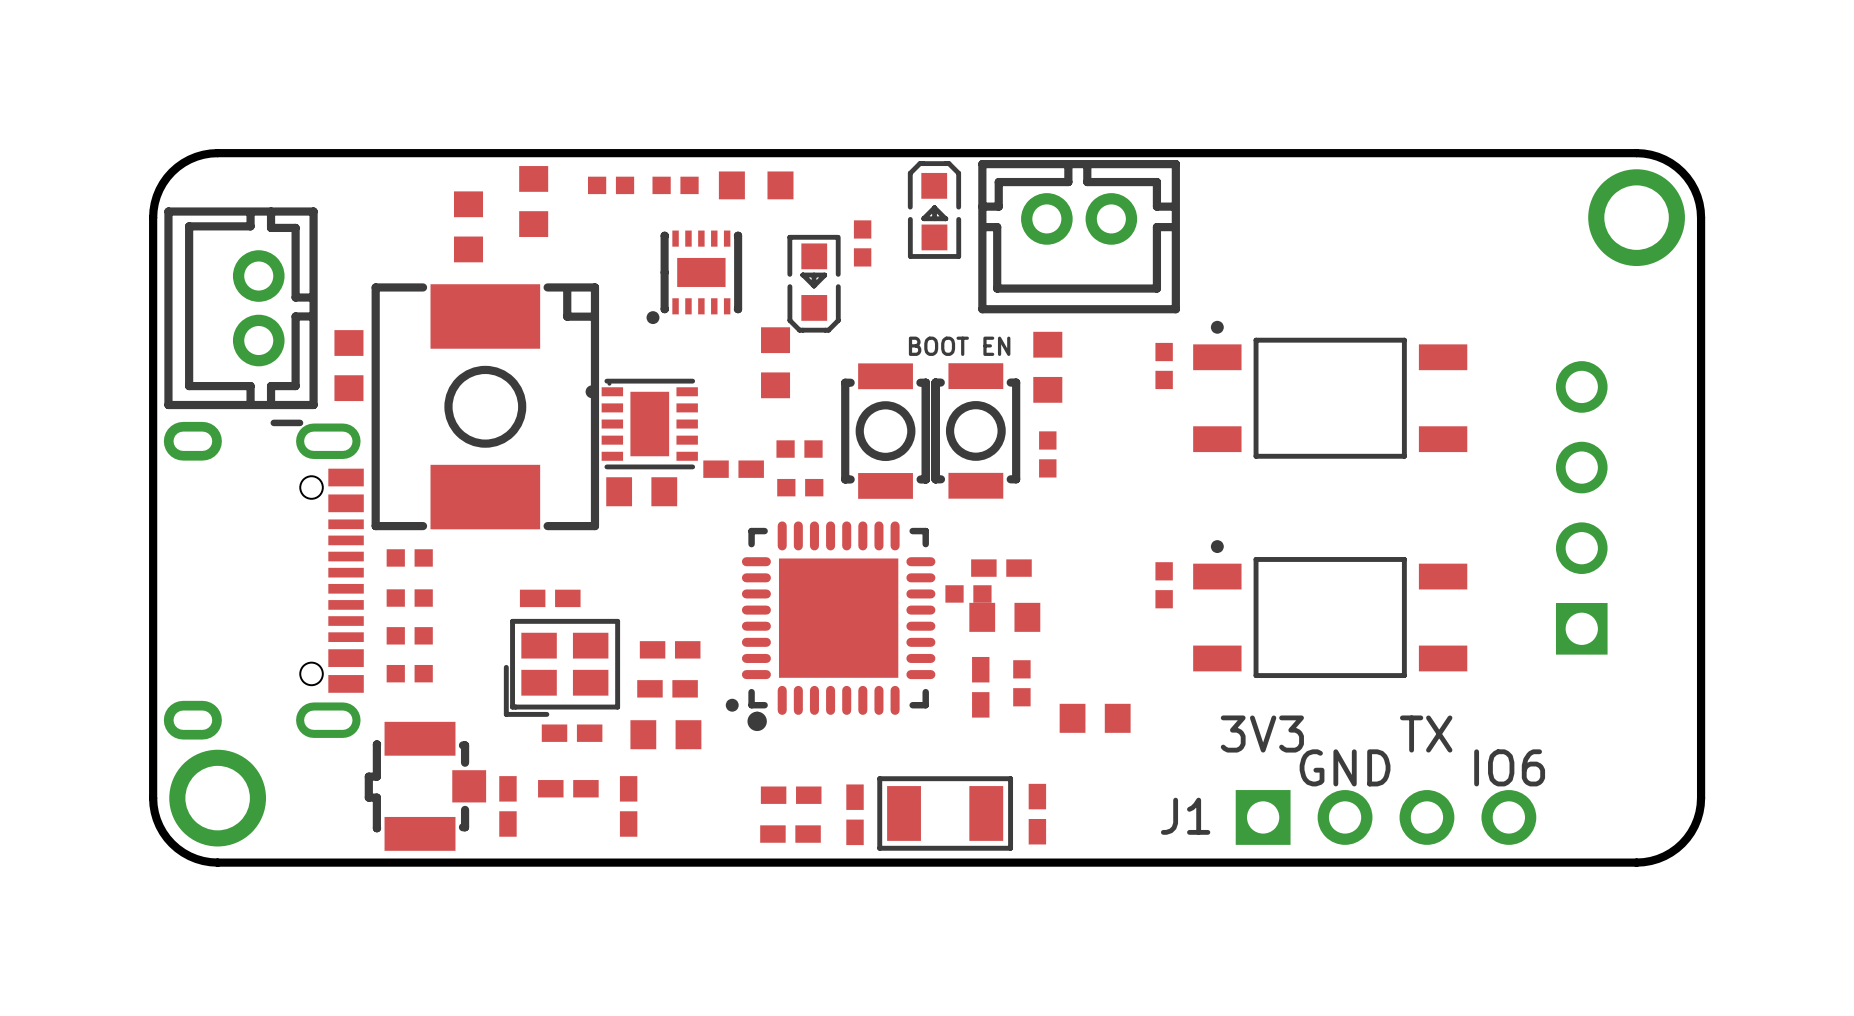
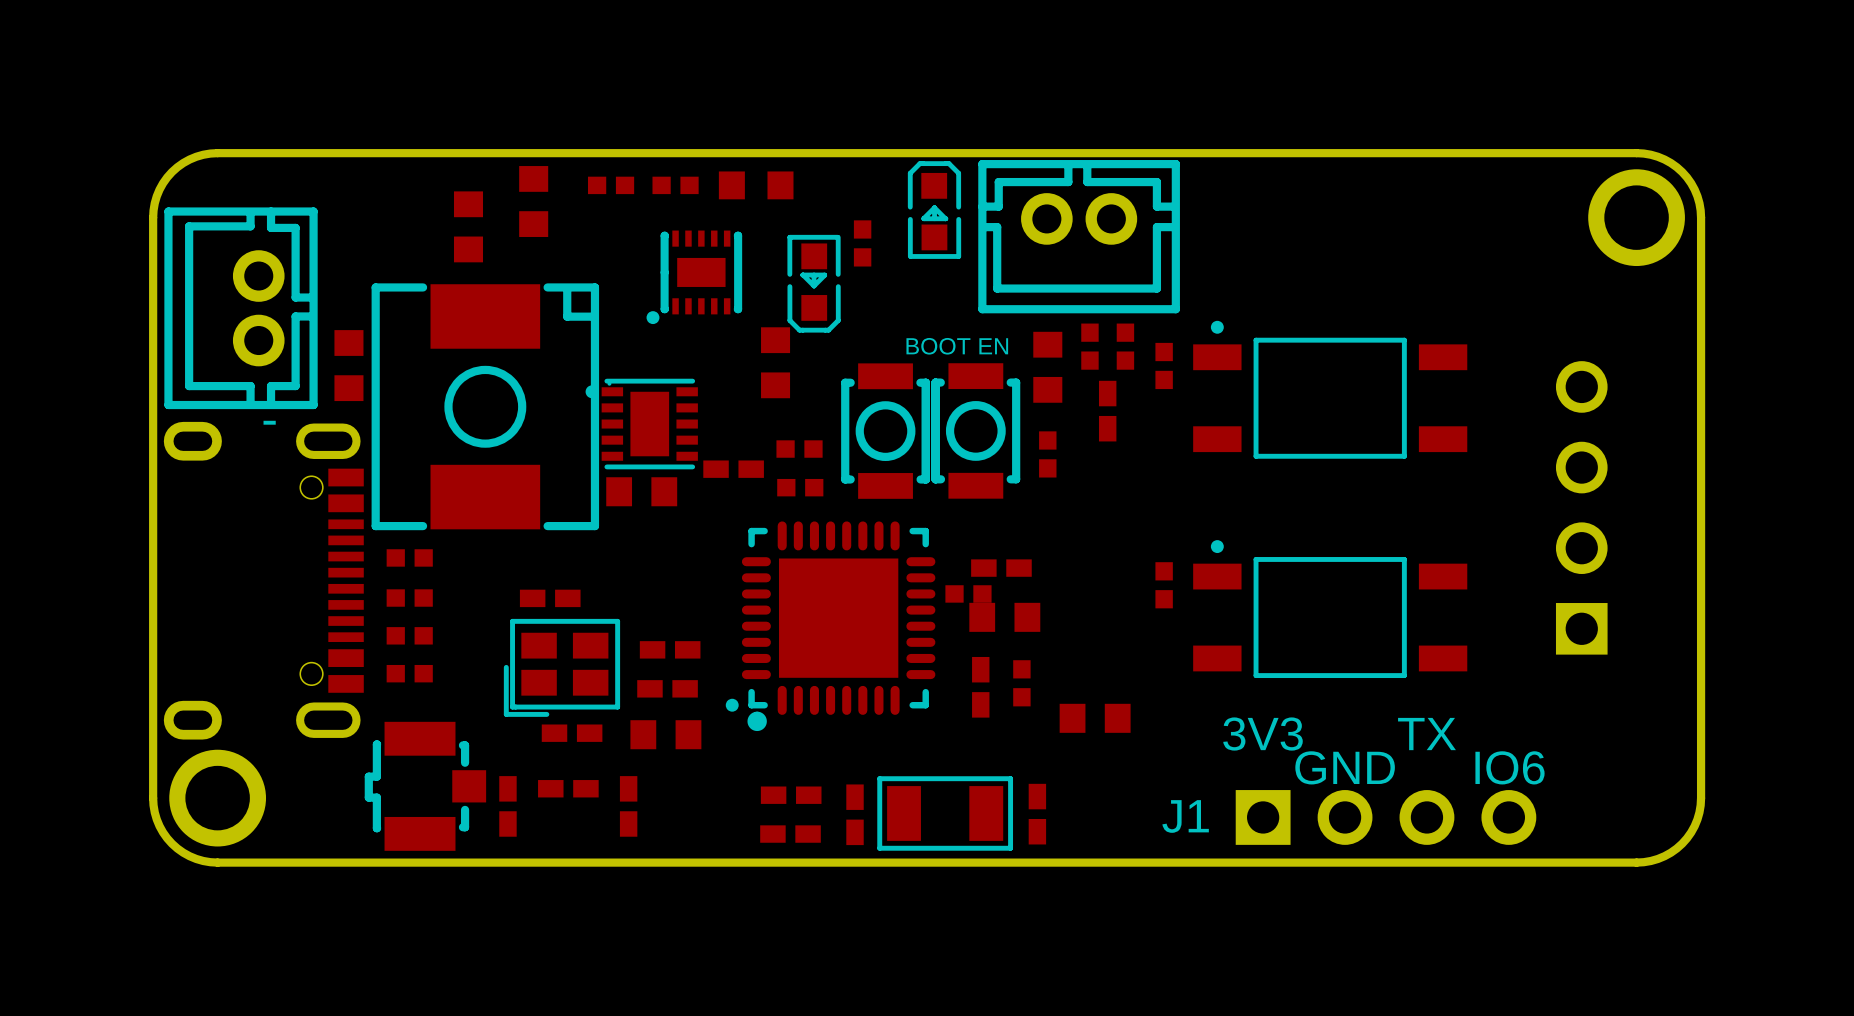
part: none -> (1089, 346)
part: none -> (1125, 346)
part: none -> (1107, 411)

